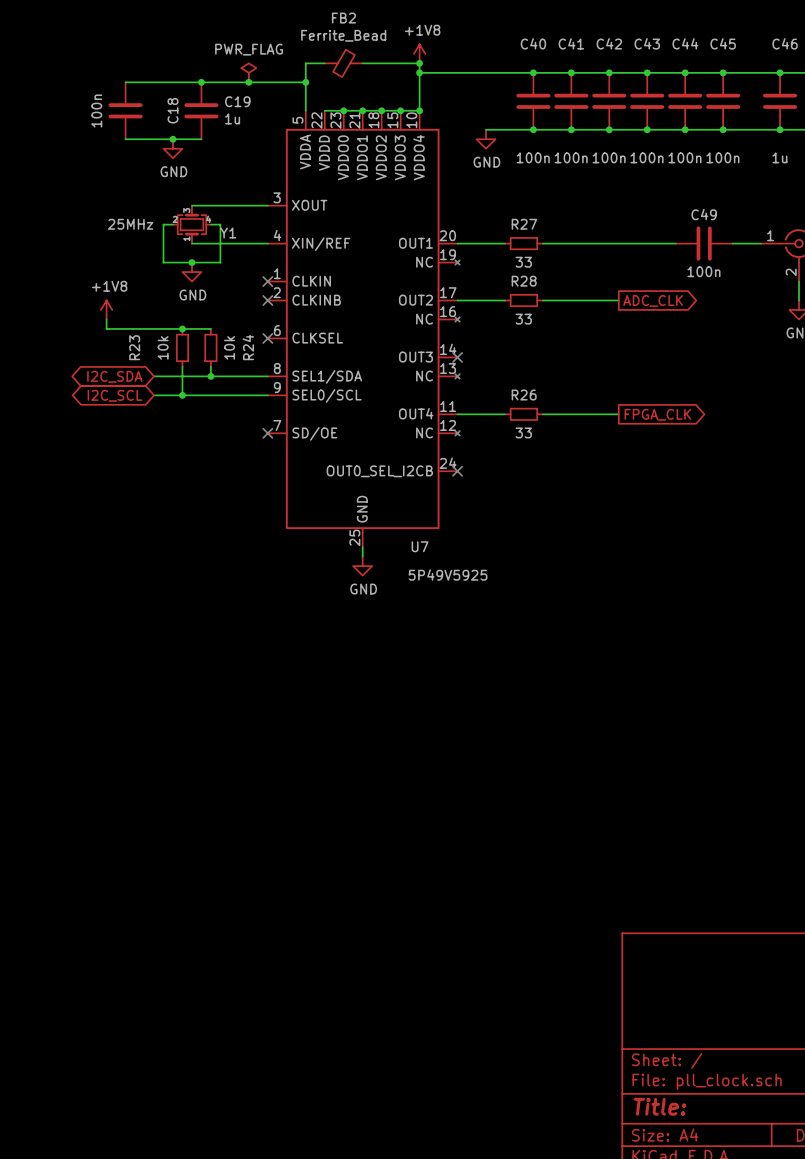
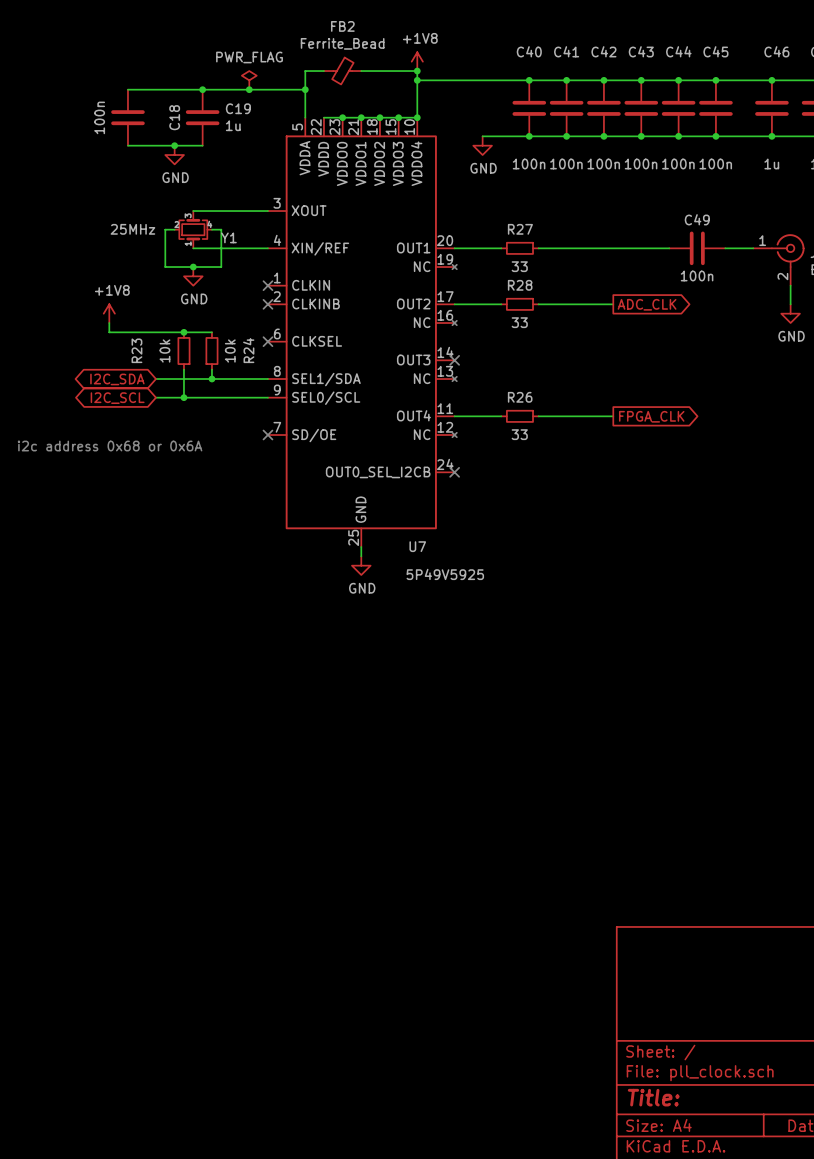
text: none -> i2c address 0x68 or 0x6A (110, 446)

